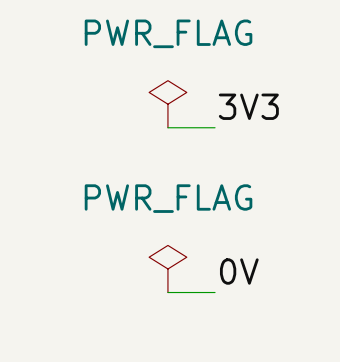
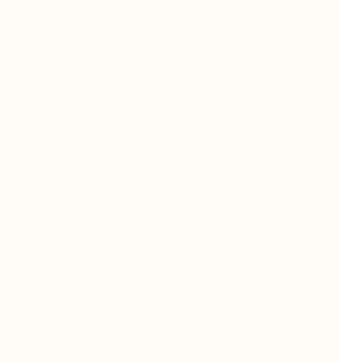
power symbol: PWR_FLAG (167, 104) -> none
label: 3V3 (248, 106) -> none
wire: (167, 127) (215, 127) -> none
power symbol: PWR_FLAG (167, 268) -> none
label: 0V (239, 271) -> none
wire: (167, 292) (215, 292) -> none

